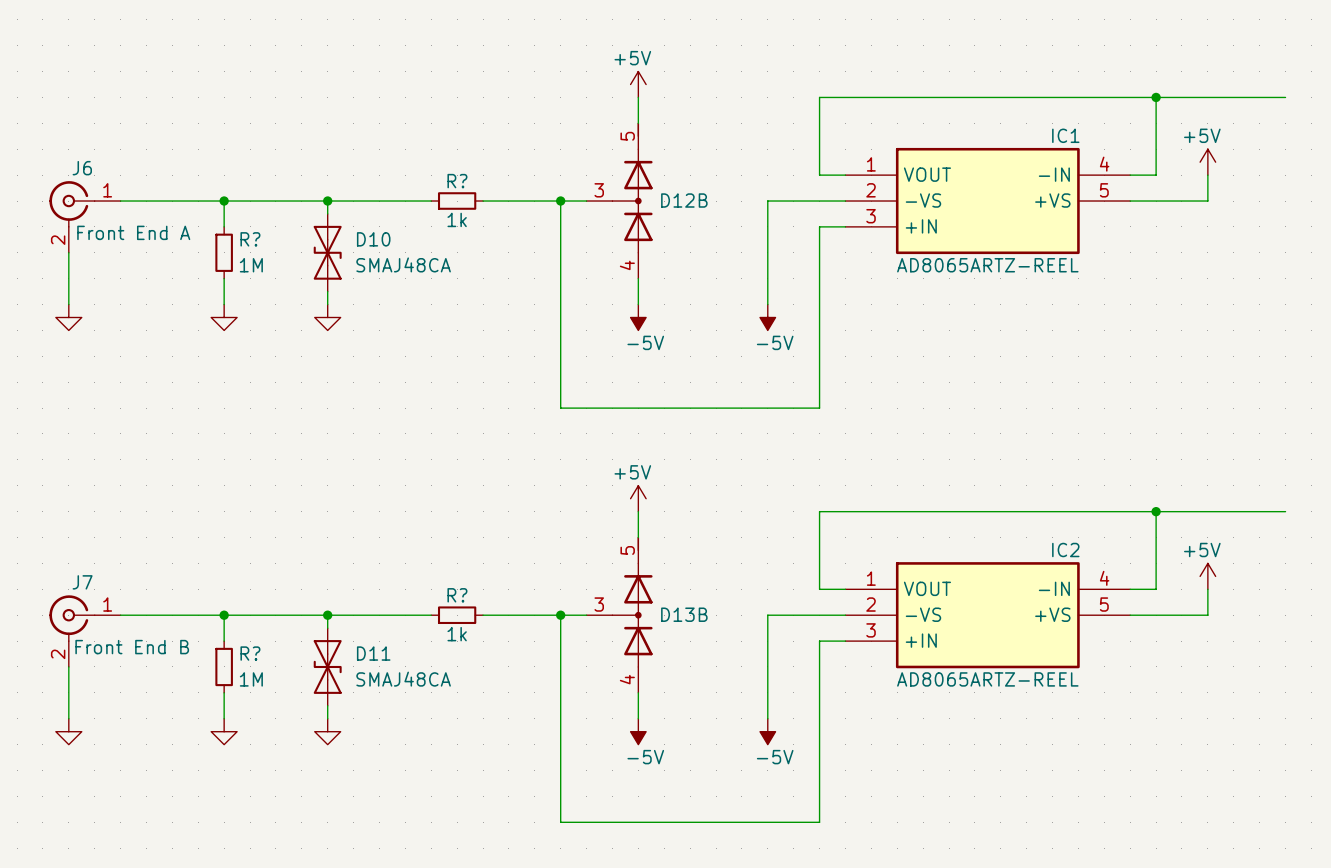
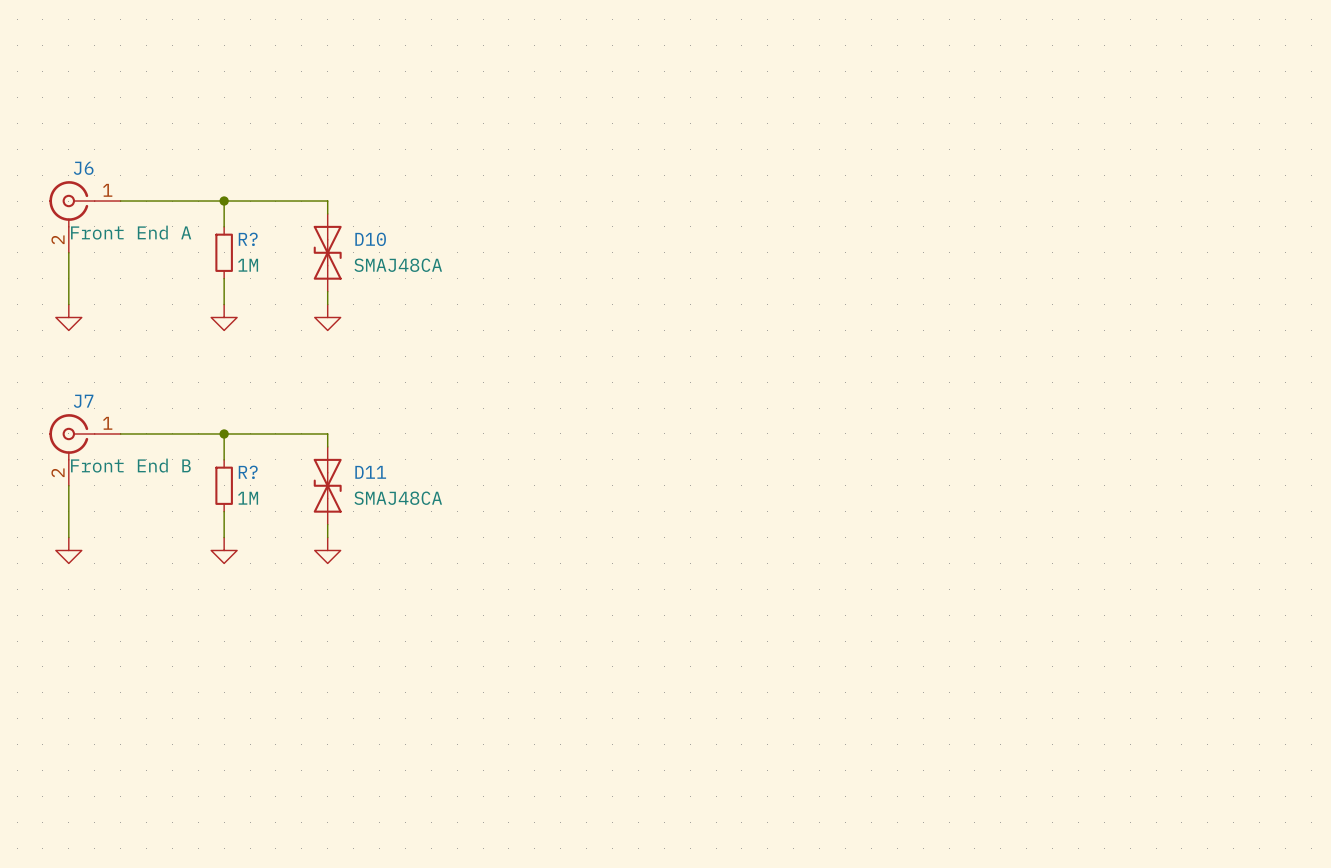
power symbol: +5V (638, 84) -> none
wire: (638, 97) (638, 123) -> none
wire: (1156, 97) (1156, 175) (1130, 175) -> none
junction: (1156, 97) -> none
wire: (1285, 97) (819, 97) (819, 175) (845, 175) -> none
power symbol: +5V (1207, 162) -> none
wire: (1207, 175) (1207, 201) (1130, 201) -> none
wire: (327, 201) (431, 201) -> none
junction: (327, 201) -> none
R?: 1k (457, 201) -> none
wire: (483, 201) (586, 201) -> none
wire: (560, 201) (560, 408) (819, 408) (819, 226) (845, 226) -> none
junction: (560, 201) -> none
D12B: (619, 201) -> none
wire: (845, 201) (767, 201) (767, 304) -> none
IC1: AD8065ARTZ-REEL (987, 201) -> none
wire: (638, 278) (638, 304) -> none
power symbol: -5V (638, 317) -> none
power symbol: -5V (767, 317) -> none
wire: none -> (120, 433) (327, 433) (327, 446)
junction: none -> (224, 433)
power symbol: +5V (638, 498) -> none
wire: (638, 511) (638, 537) -> none
wire: (1156, 511) (1156, 589) (1130, 589) -> none
junction: (1156, 511) -> none
wire: (1285, 511) (819, 511) (819, 589) (845, 589) -> none
power symbol: none -> (68, 550)
power symbol: none -> (224, 550)
power symbol: none -> (327, 550)
power symbol: +5V (1207, 576) -> none
wire: (1207, 589) (1207, 615) (1130, 615) -> none
wire: (120, 615) (431, 615) -> none
wire: (224, 615) (224, 641) -> (224, 433) (224, 459)
junction: (224, 615) -> none
wire: (327, 615) (327, 628) -> none
junction: (327, 615) -> none
R?: 1k (457, 615) -> none
wire: (483, 615) (586, 615) -> none
wire: (560, 615) (560, 822) (819, 822) (819, 641) (845, 641) -> none
junction: (560, 615) -> none
D13B: (619, 615) -> none
wire: (845, 615) (767, 615) (767, 718) -> none
IC2: AD8065ARTZ-REEL (987, 615) -> none
J7 position: (84, 631) -> (84, 449)
wire: (68, 666) (68, 718) -> (68, 485) (68, 537)
R? position: (224, 666) -> (224, 485)
D11 position: (327, 666) -> (327, 485)
wire: (224, 692) (224, 718) -> (224, 511) (224, 537)
wire: (638, 692) (638, 718) -> none
wire: (327, 705) (327, 718) -> (327, 524) (327, 537)
power symbol: (68, 731) -> none
power symbol: (224, 731) -> none
power symbol: (327, 731) -> none
power symbol: -5V (638, 731) -> none
power symbol: -5V (767, 731) -> none

